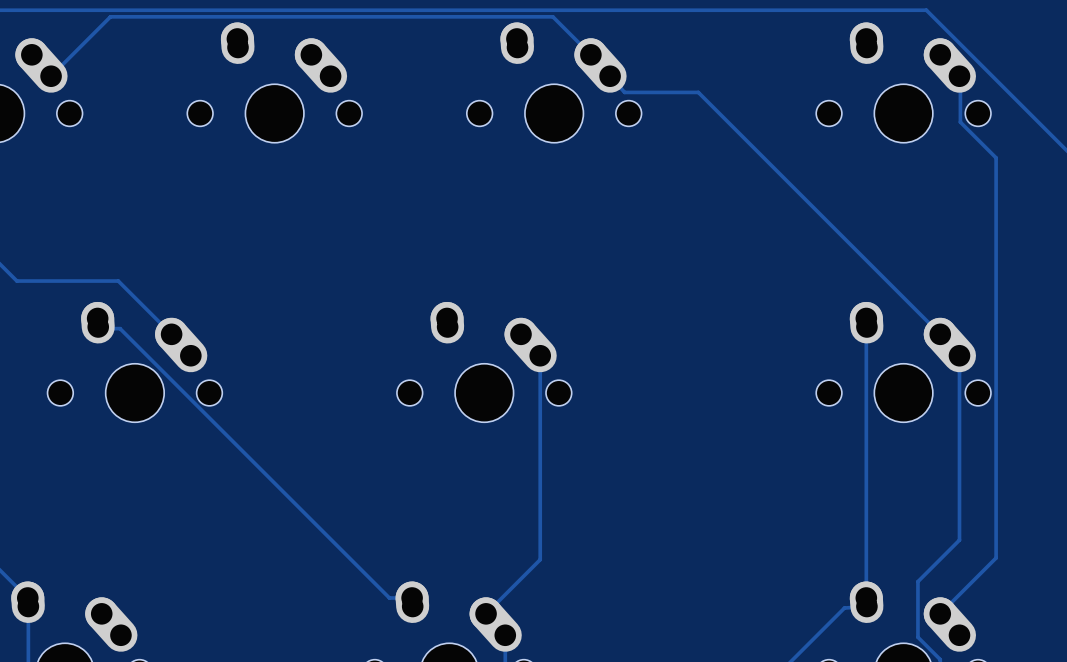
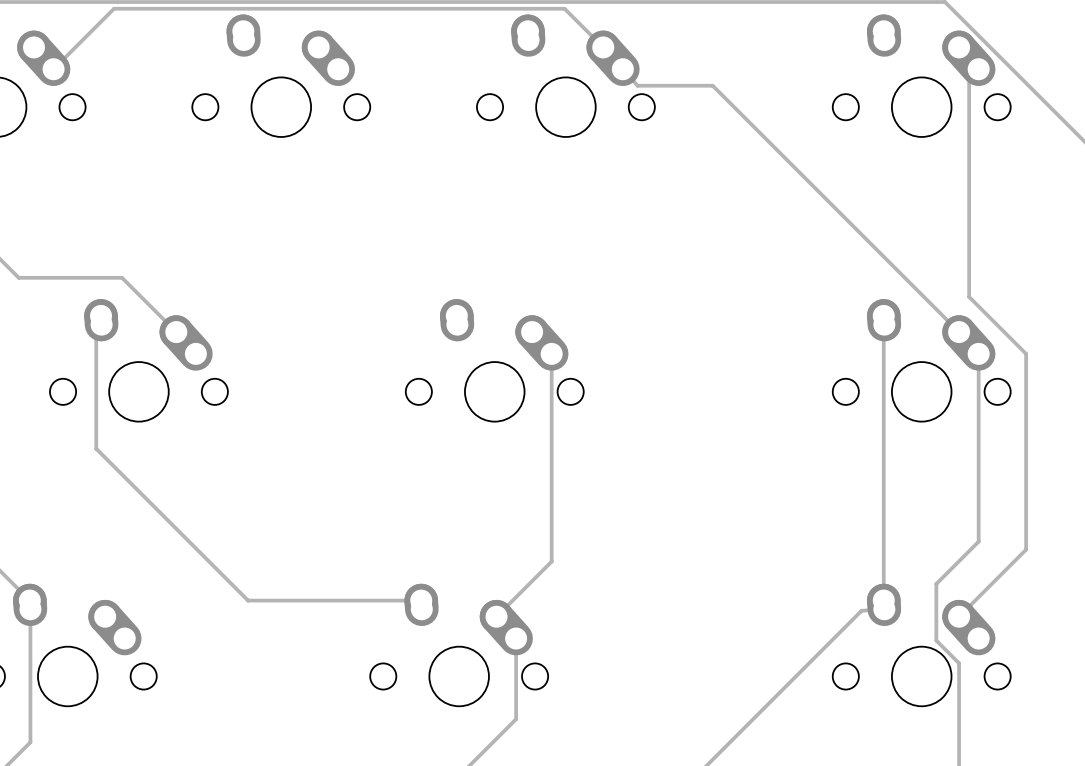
track: (959, 76) (960, 122) (996, 157) (996, 558) -> (978, 69) (969, 78) (969, 296) (1026, 353) (1026, 549) (1015, 559)
track: (98, 326) (99, 328) (120, 328) (389, 597) -> (101, 324) (96, 329) (96, 448) (248, 600) (398, 600)

